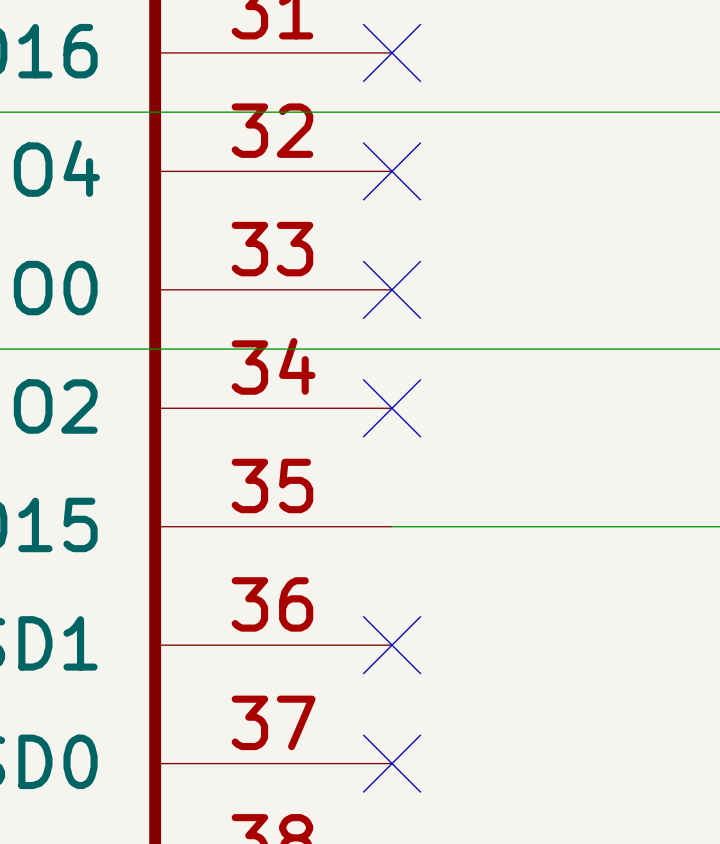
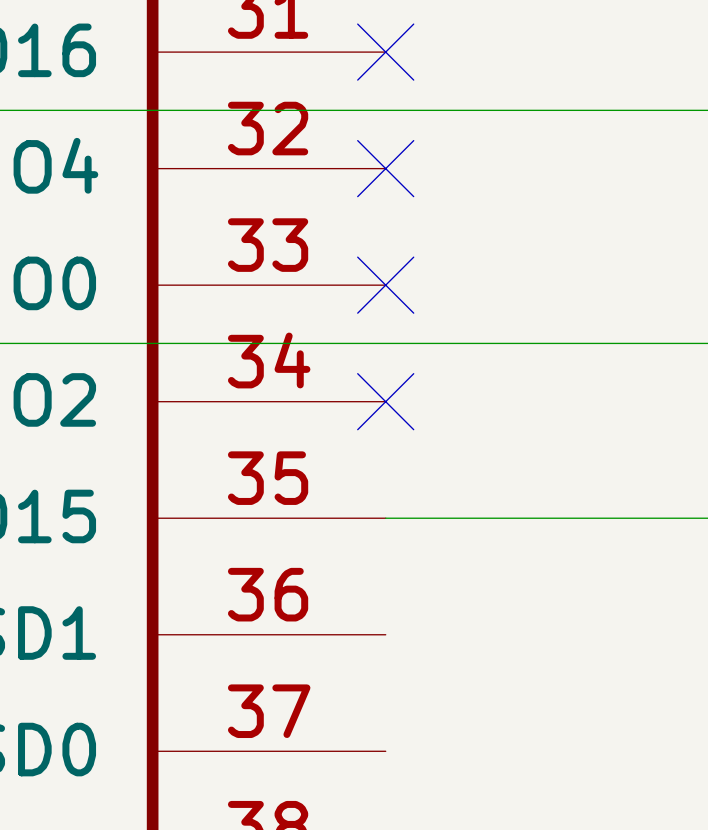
no-connect mark: (392, 645) -> none
no-connect mark: (392, 763) -> none

